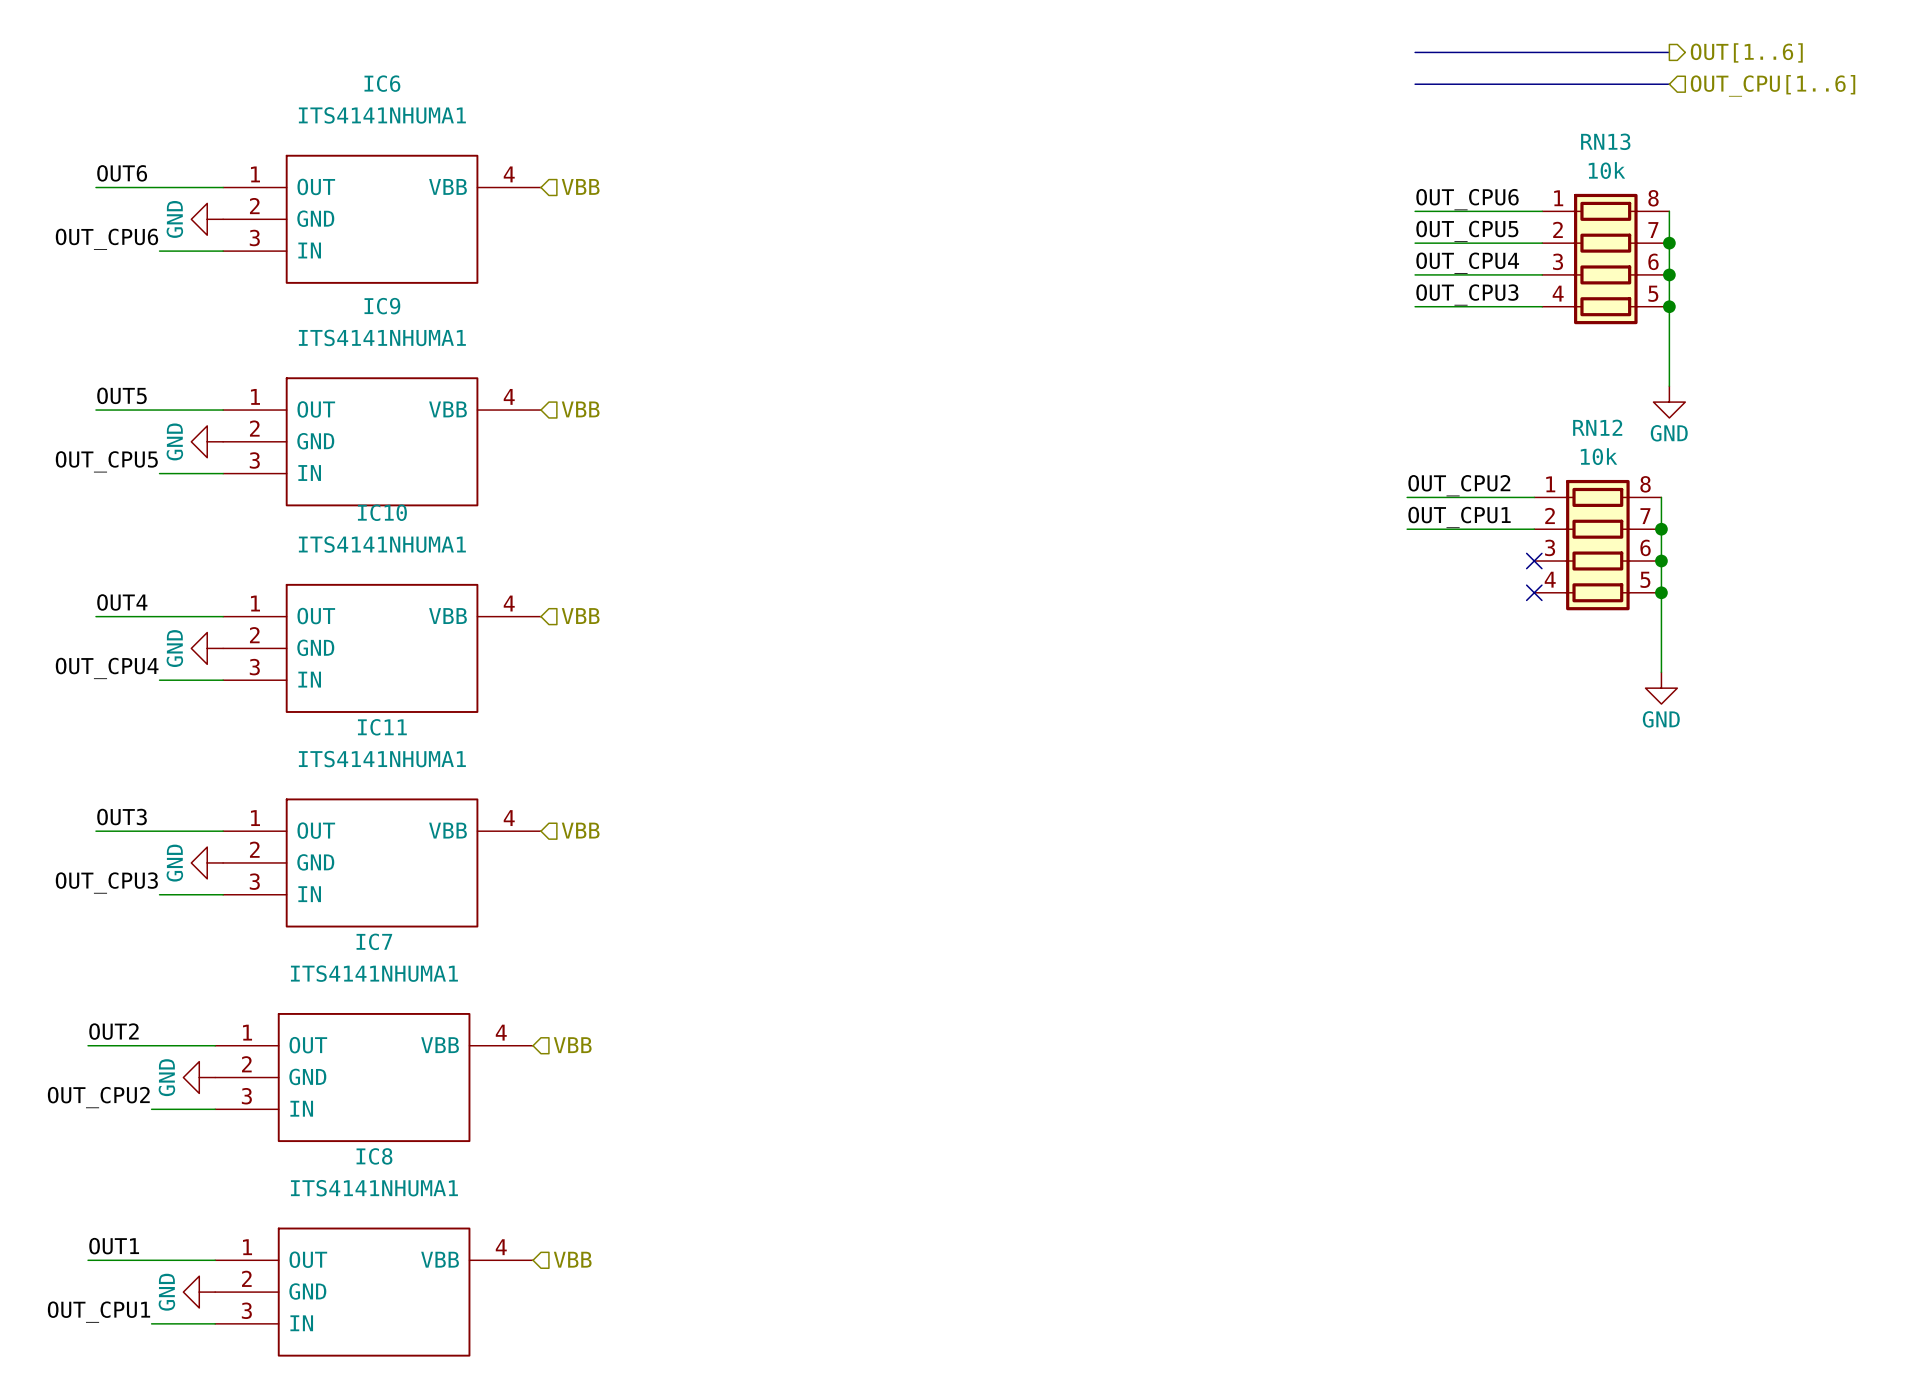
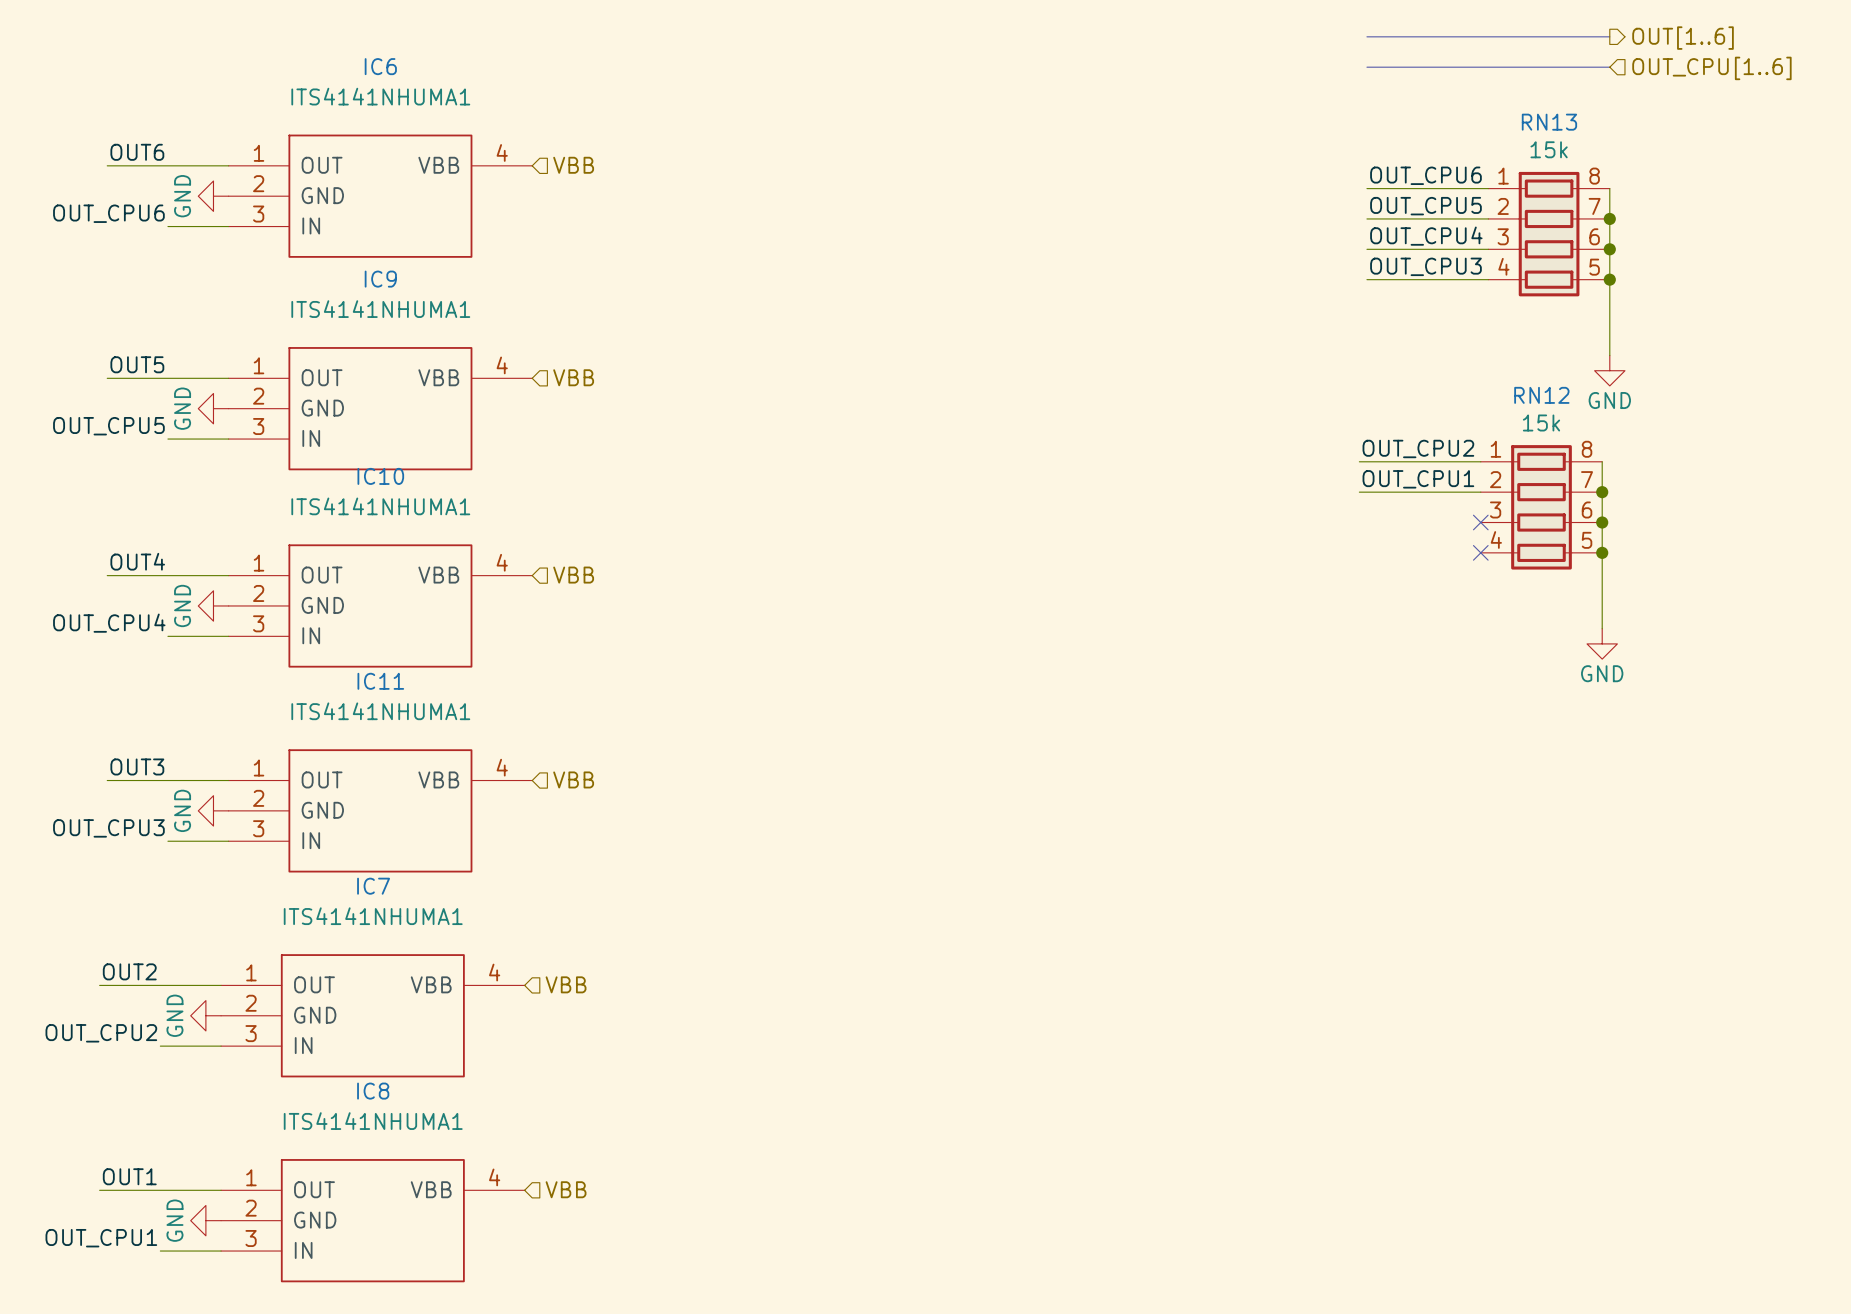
RN13 value: 10k (1606, 170) -> 15k (1549, 149)
RN12 value: 10k (1599, 456) -> 15k (1541, 422)

